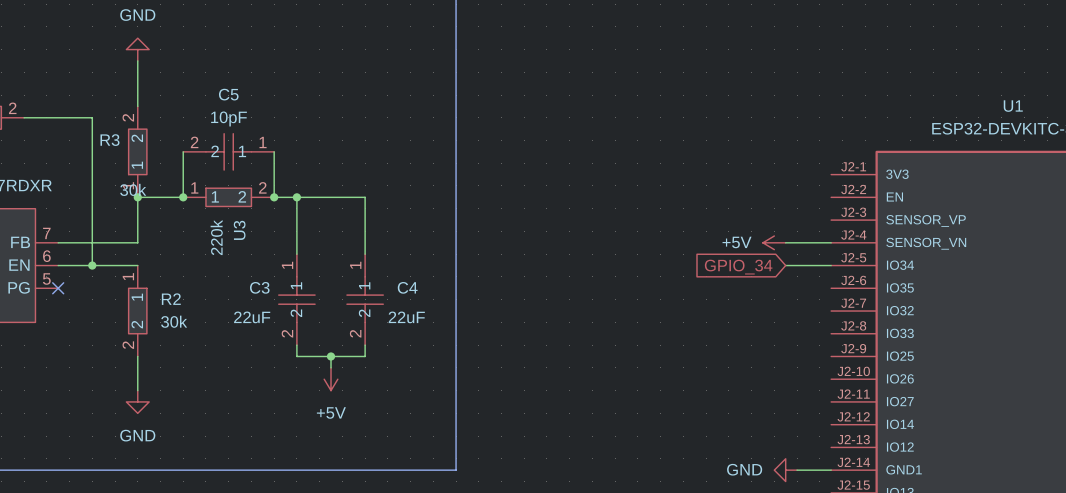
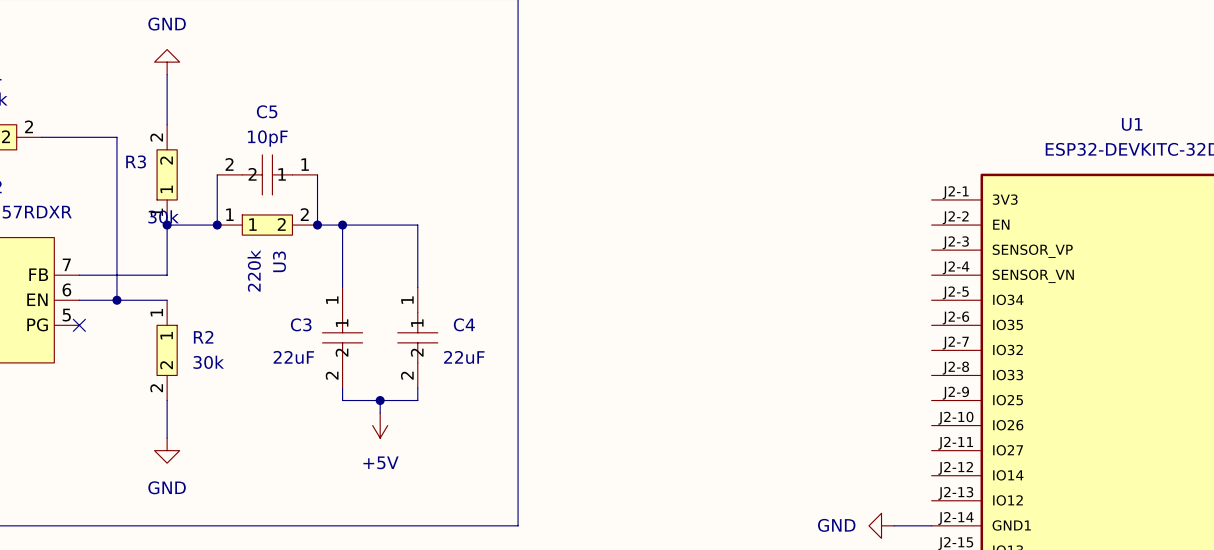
power symbol: +5V (774, 242) -> none
wire: (785, 242) (831, 242) -> none
wire: (785, 265) (831, 265) -> none
global label: GPIO_34 (738, 267) -> none

